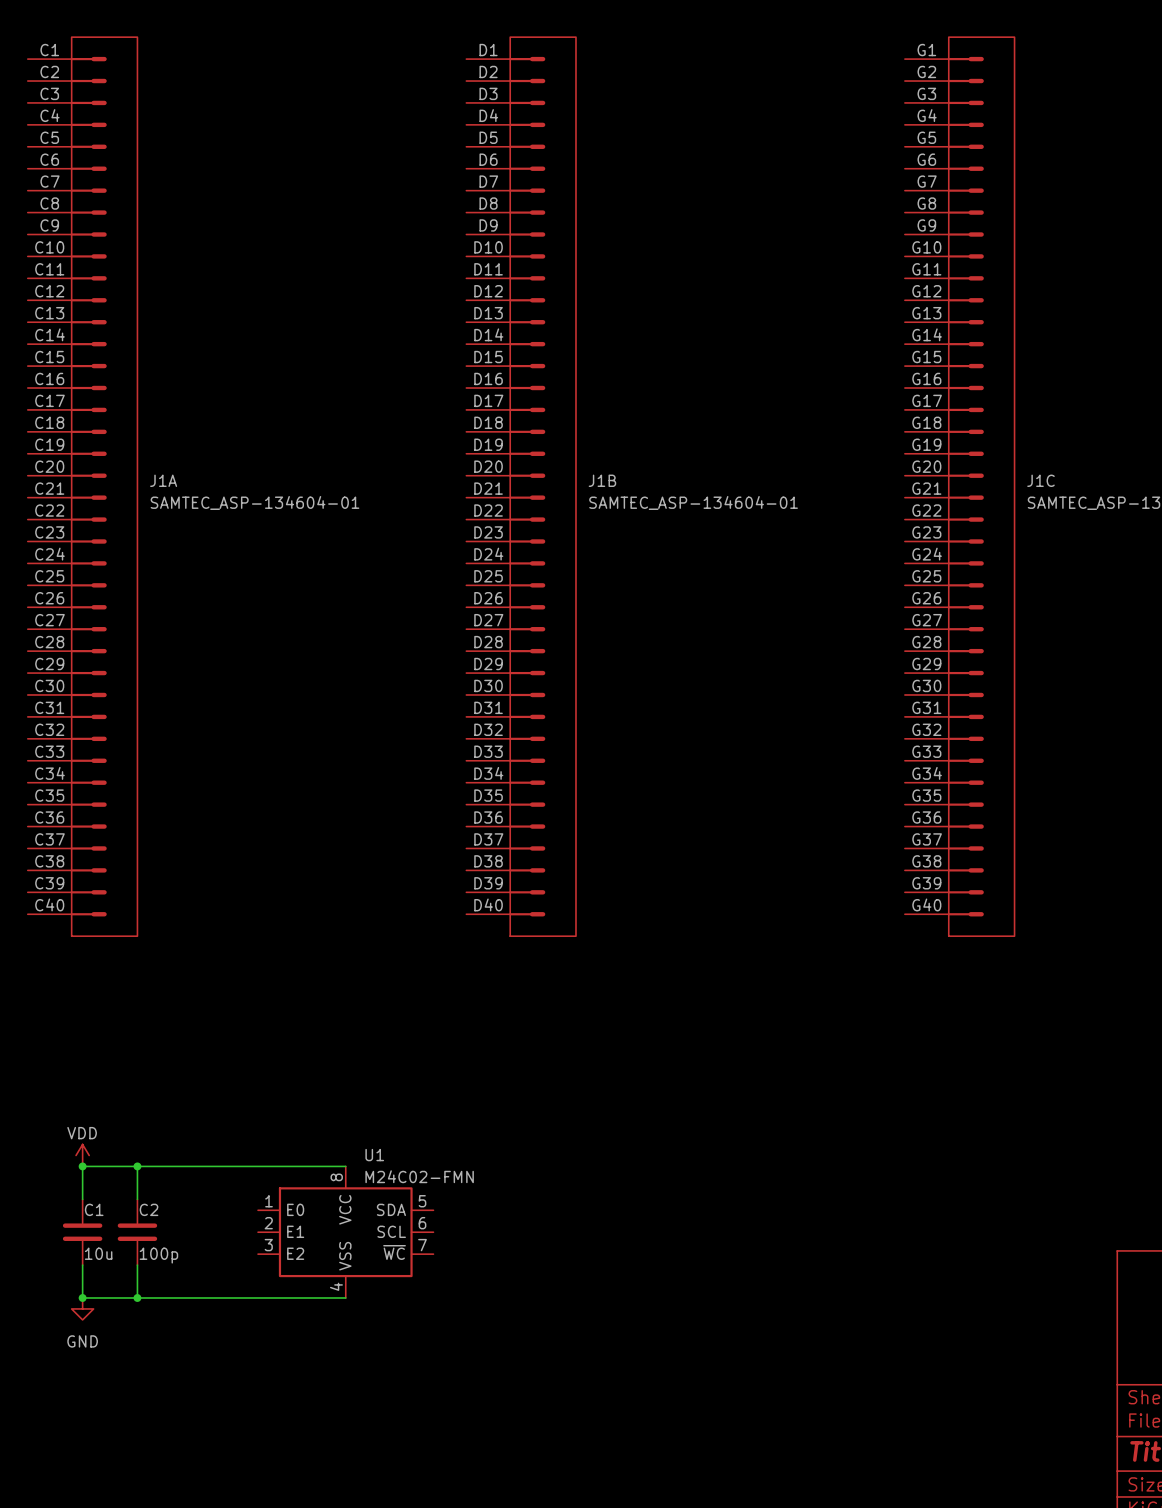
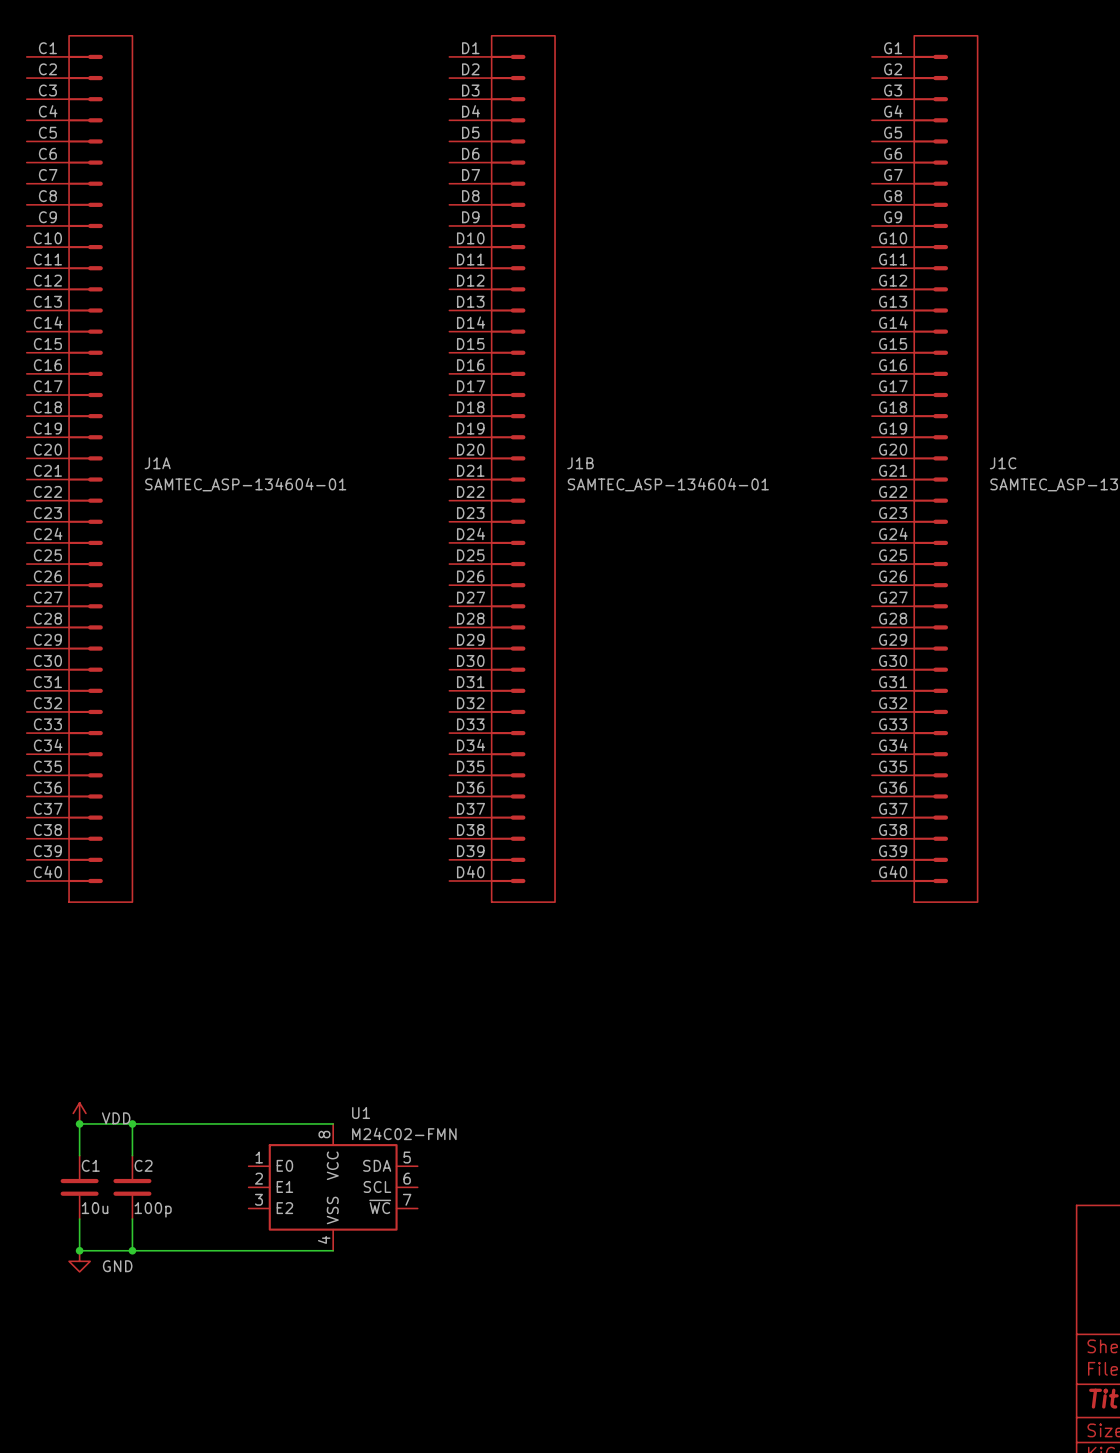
power symbol text position: VDD (82, 1133) -> VDD (116, 1118)
power symbol text position: GND (82, 1341) -> GND (117, 1266)

